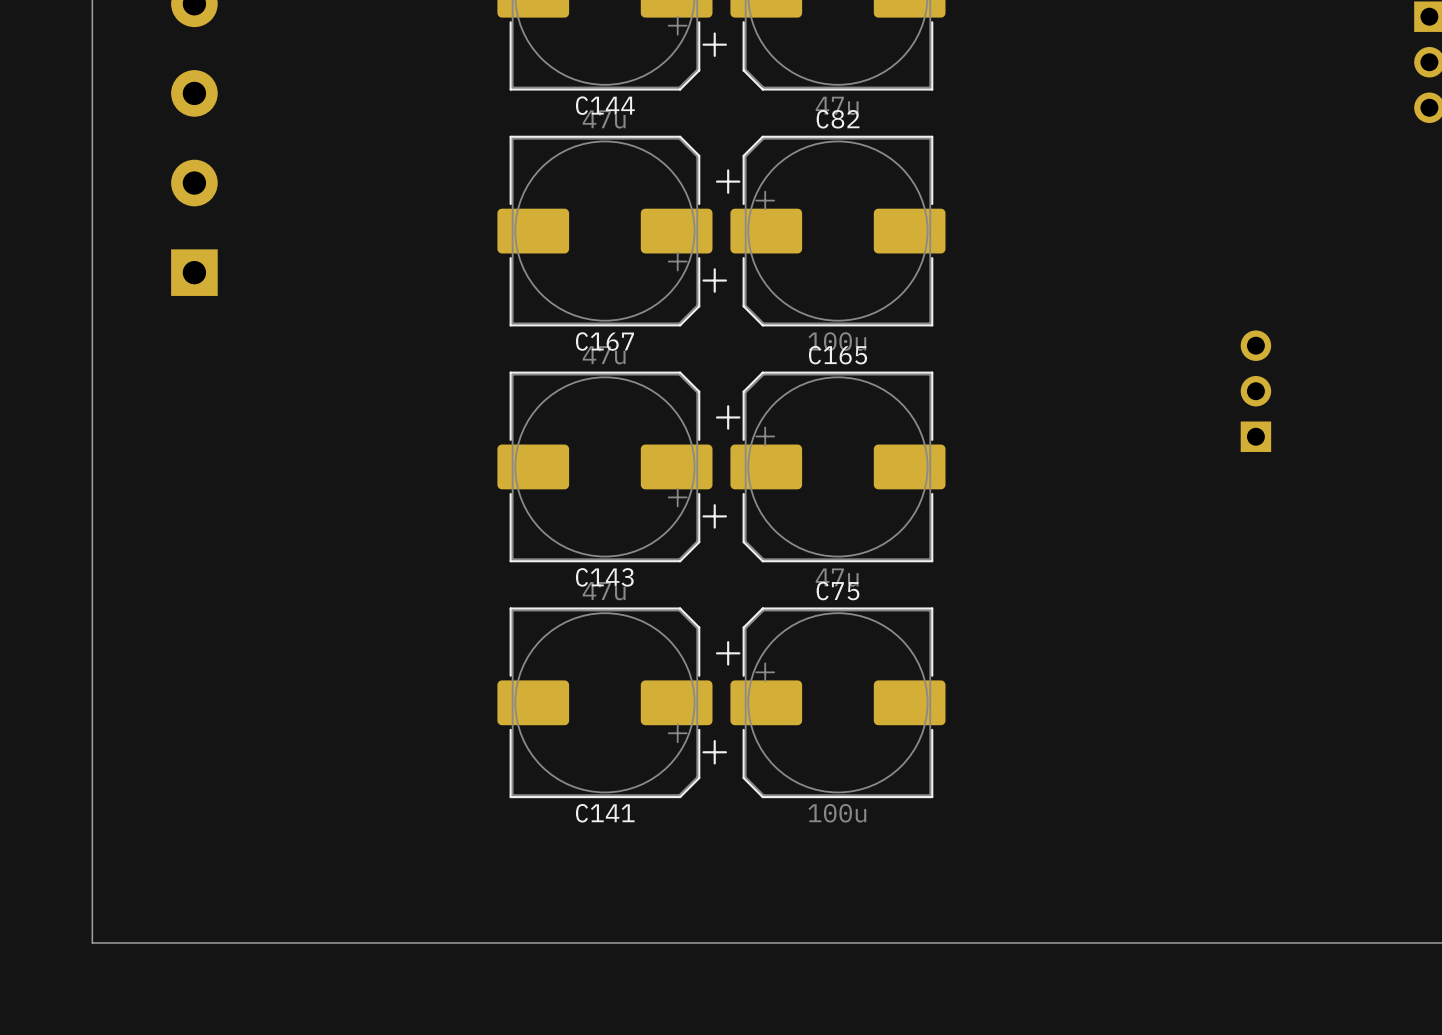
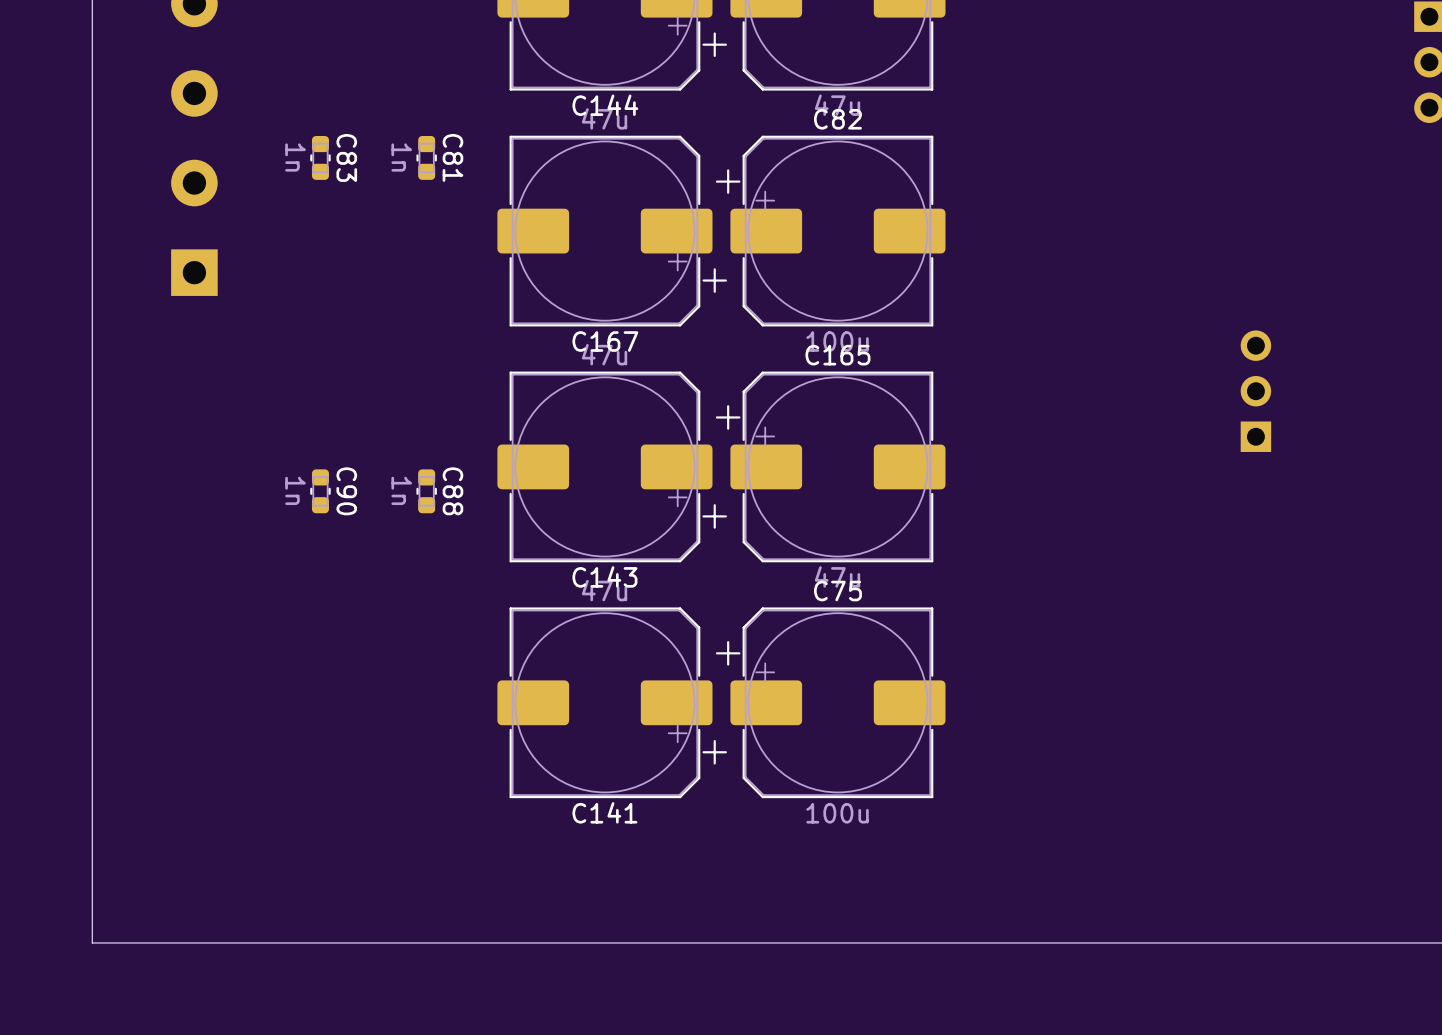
C83: none -> 1n (320, 157)
C81: none -> 1n (426, 157)
C90: none -> 1n (320, 491)
C88: none -> 1n (426, 491)

